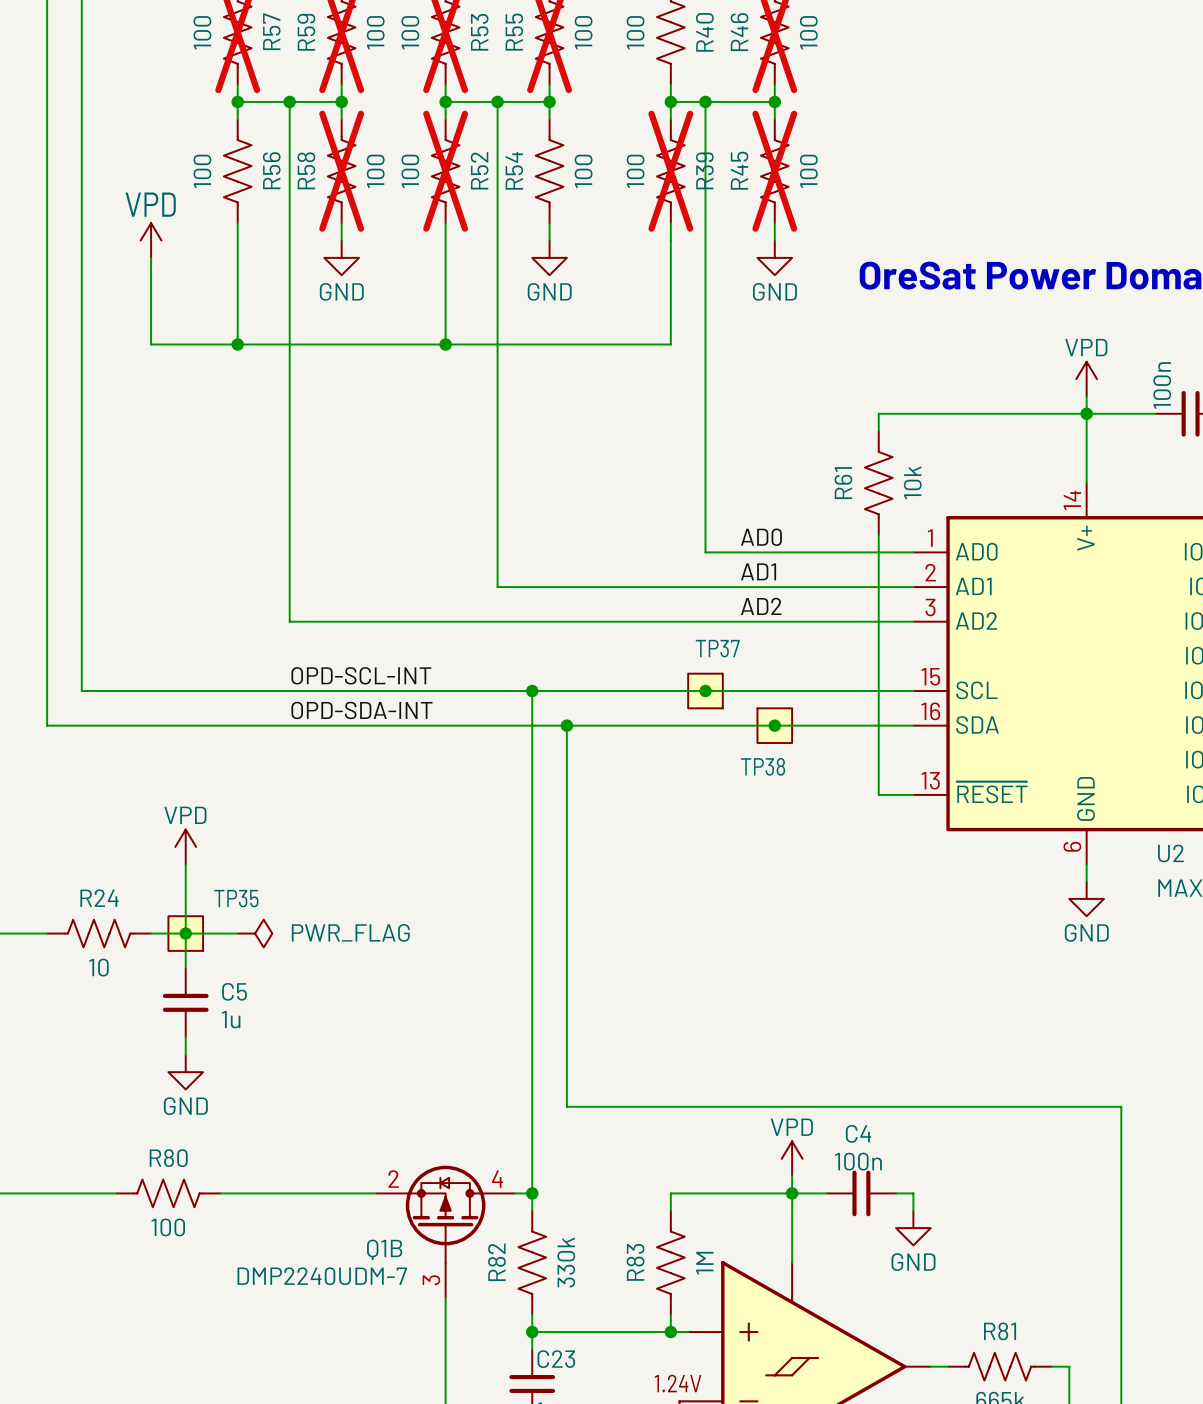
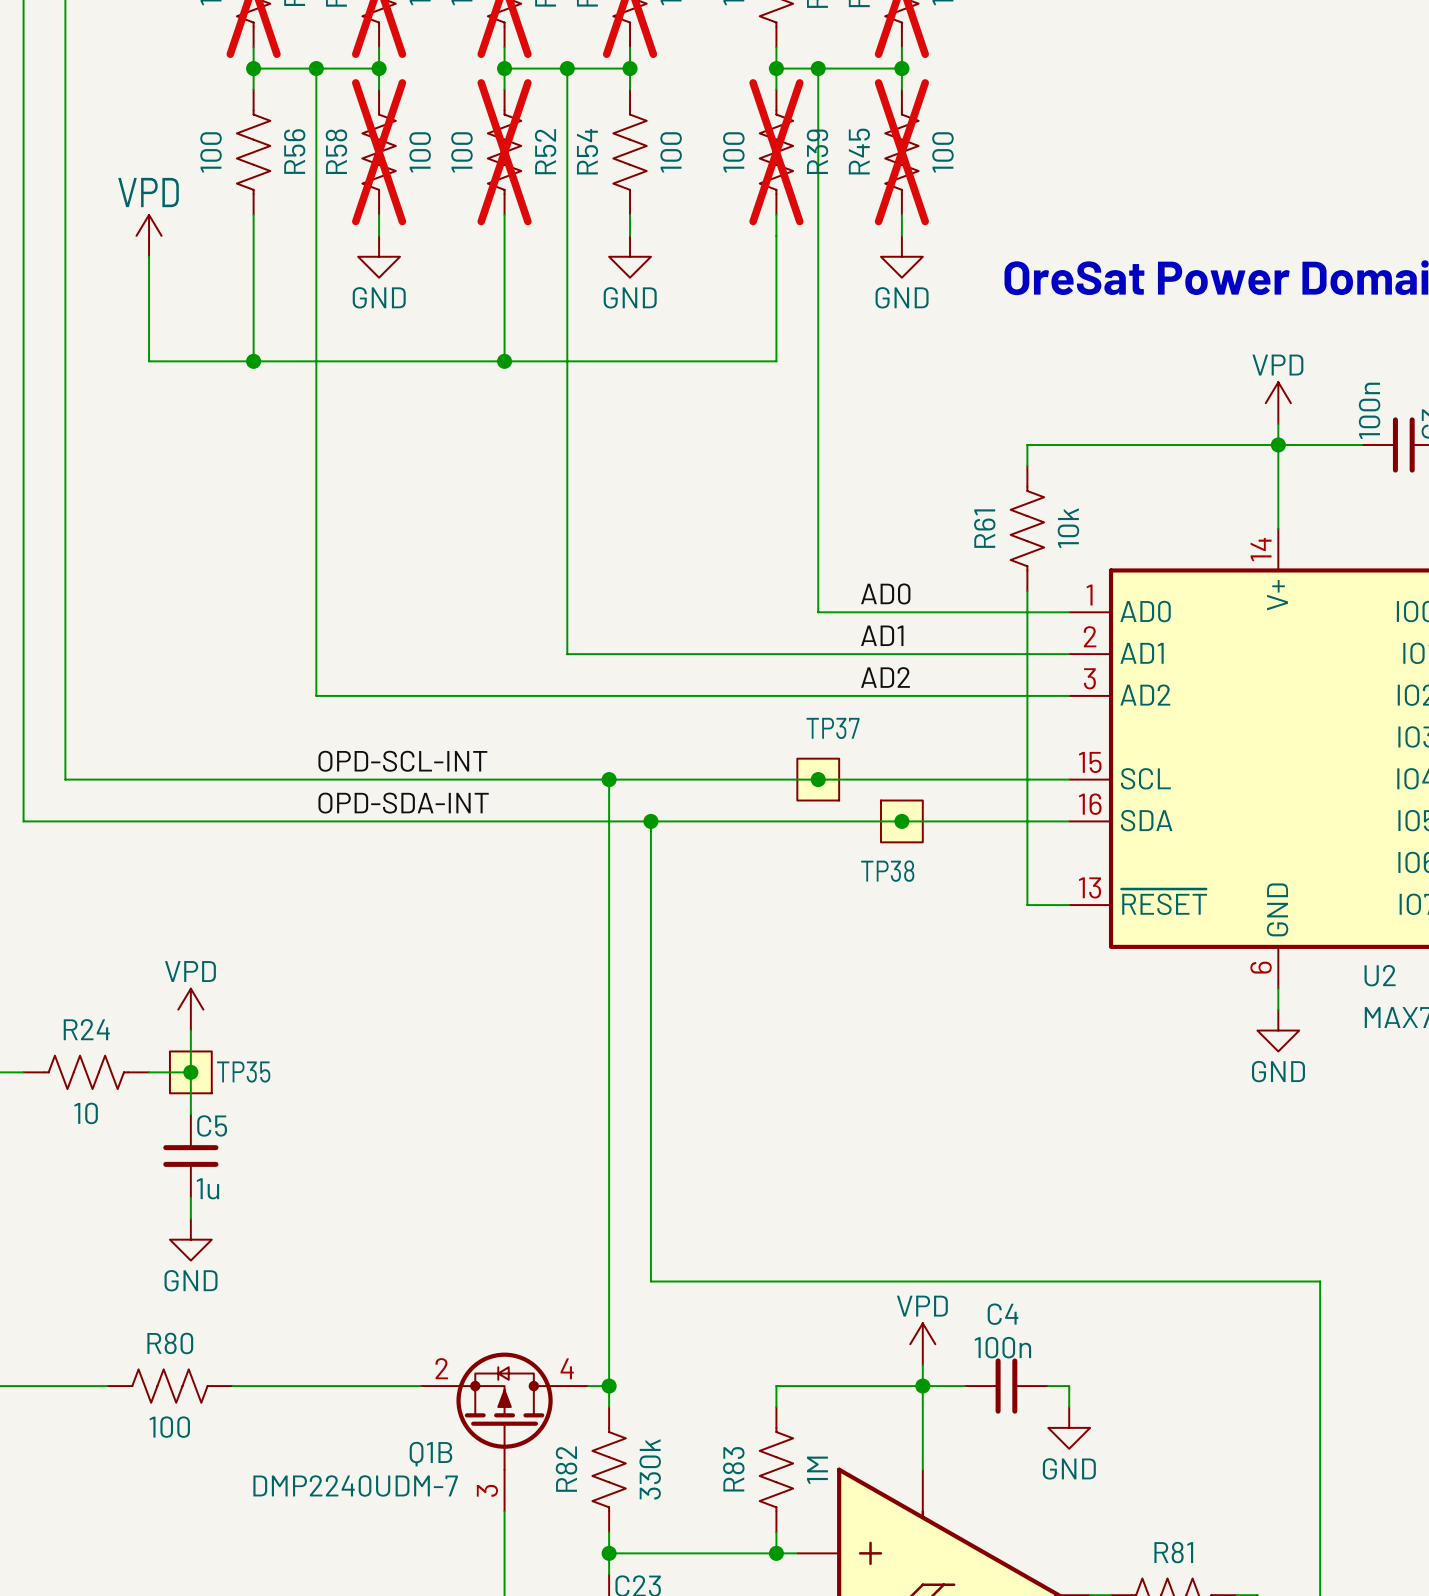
power symbol position: VPD (185, 846) -> VPD (190, 1009)
TP35 name position: TP35 (236, 898) -> TP35 (243, 1072)
wire: (185, 933) (237, 933) -> none
power symbol: PWR_FLAG (255, 933) -> none
C5 name position: C5 (234, 991) -> C5 (212, 1125)
C5 value position: 1u (231, 1019) -> 1u (207, 1188)

